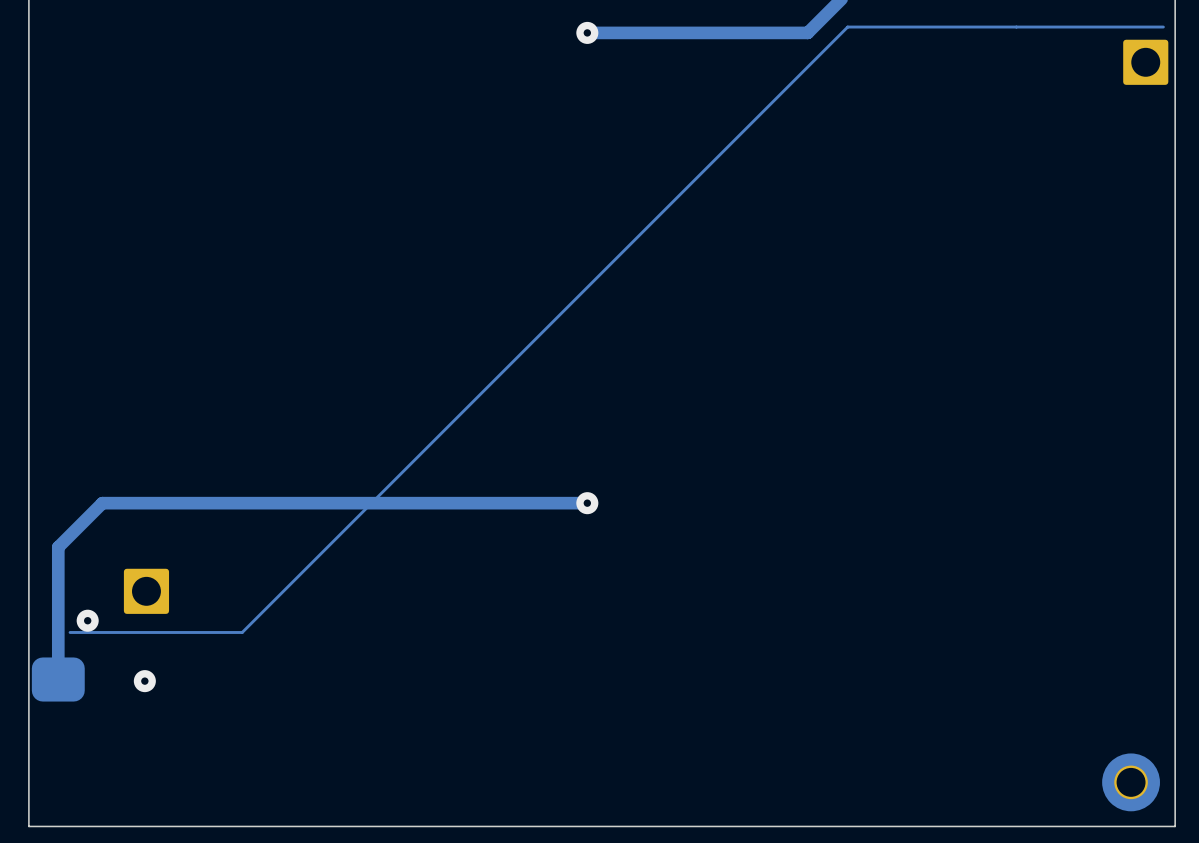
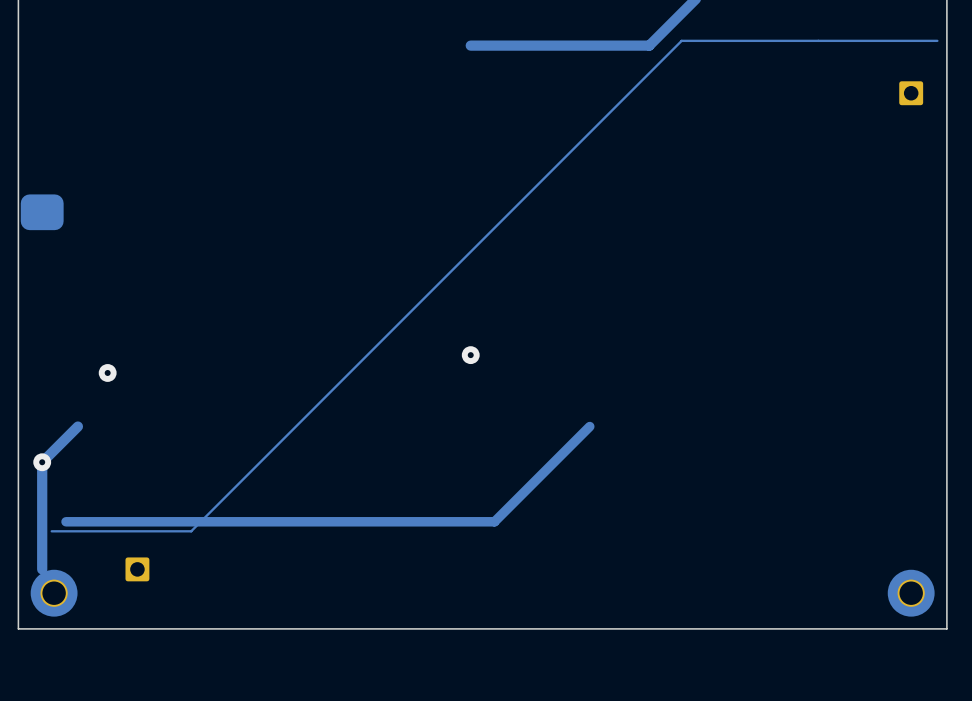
via: (587, 32) -> none
part: (1145, 62) -> none
part: none -> (911, 93)
part: none -> (42, 212)
via: none -> (470, 355)
via: none -> (107, 372)
track: (587, 503) (102, 503) -> none
via: (587, 503) -> none
track: none -> (589, 426) (494, 521) (66, 521)
via: none -> (42, 462)
part: (146, 591) -> none
via: (87, 620) -> none
part: (58, 679) -> none
part: none -> (137, 569)
via: (144, 681) -> none
part: none -> (54, 593)
board edge: (1175, 752) (1175, 826) (28, 826) (28, 752) -> (946, 628) (18, 628)
part position: (1131, 782) -> (911, 593)

